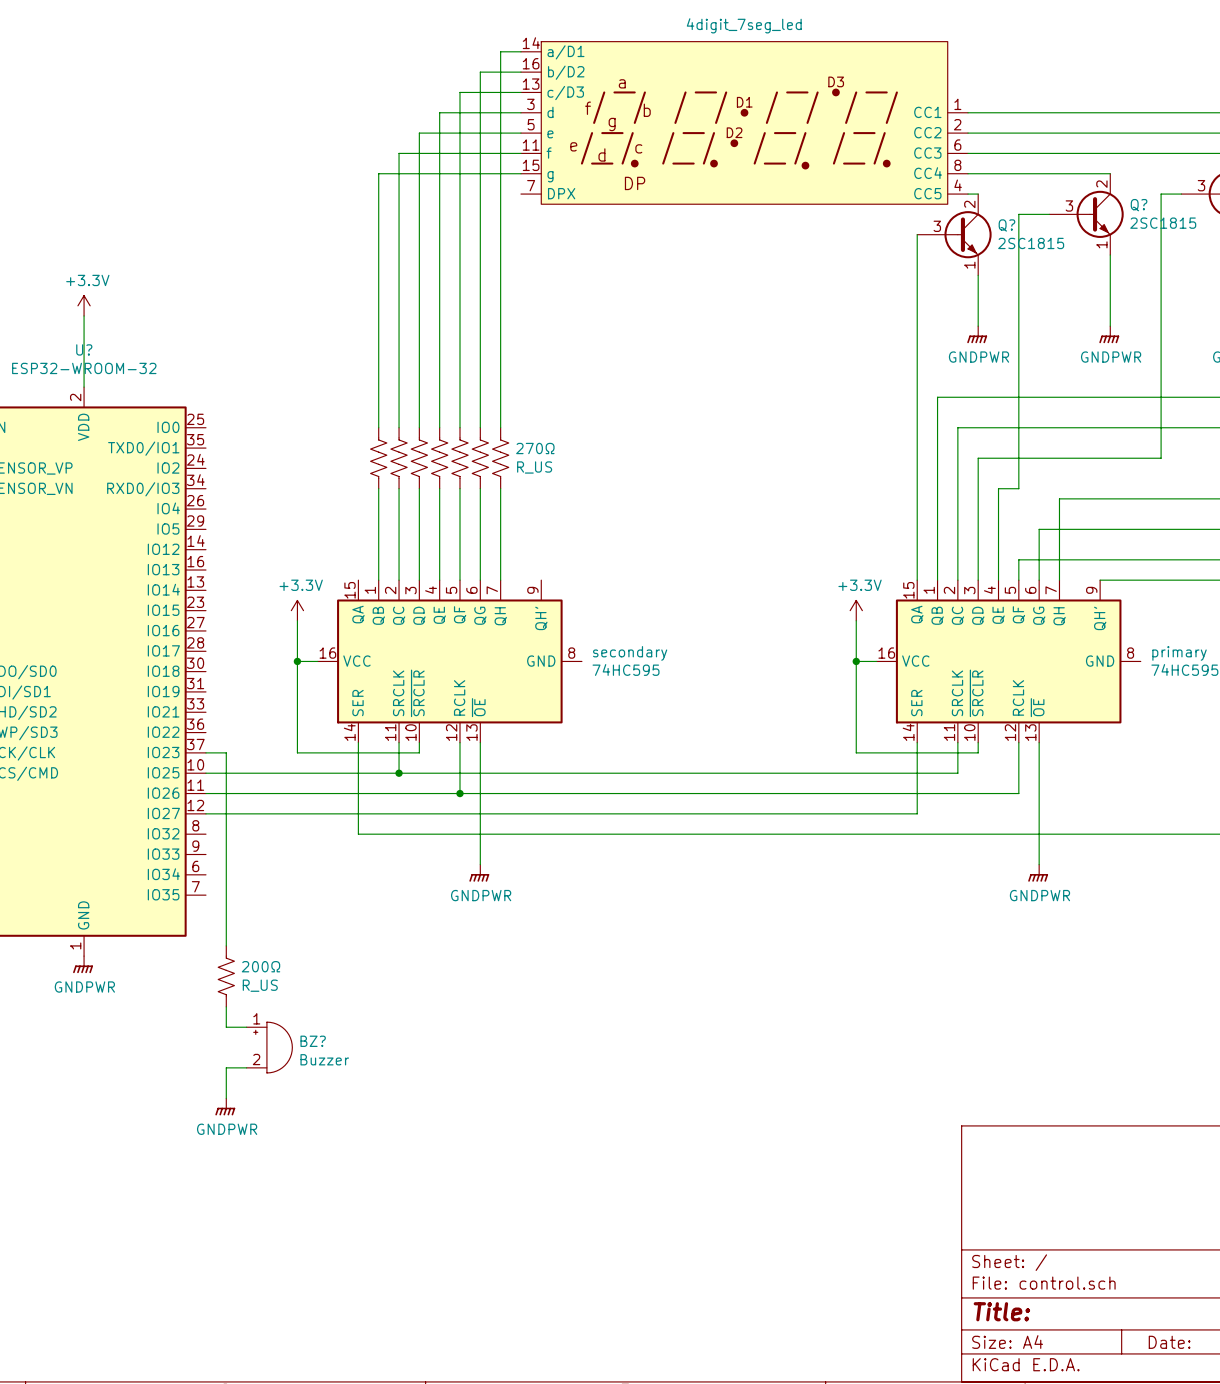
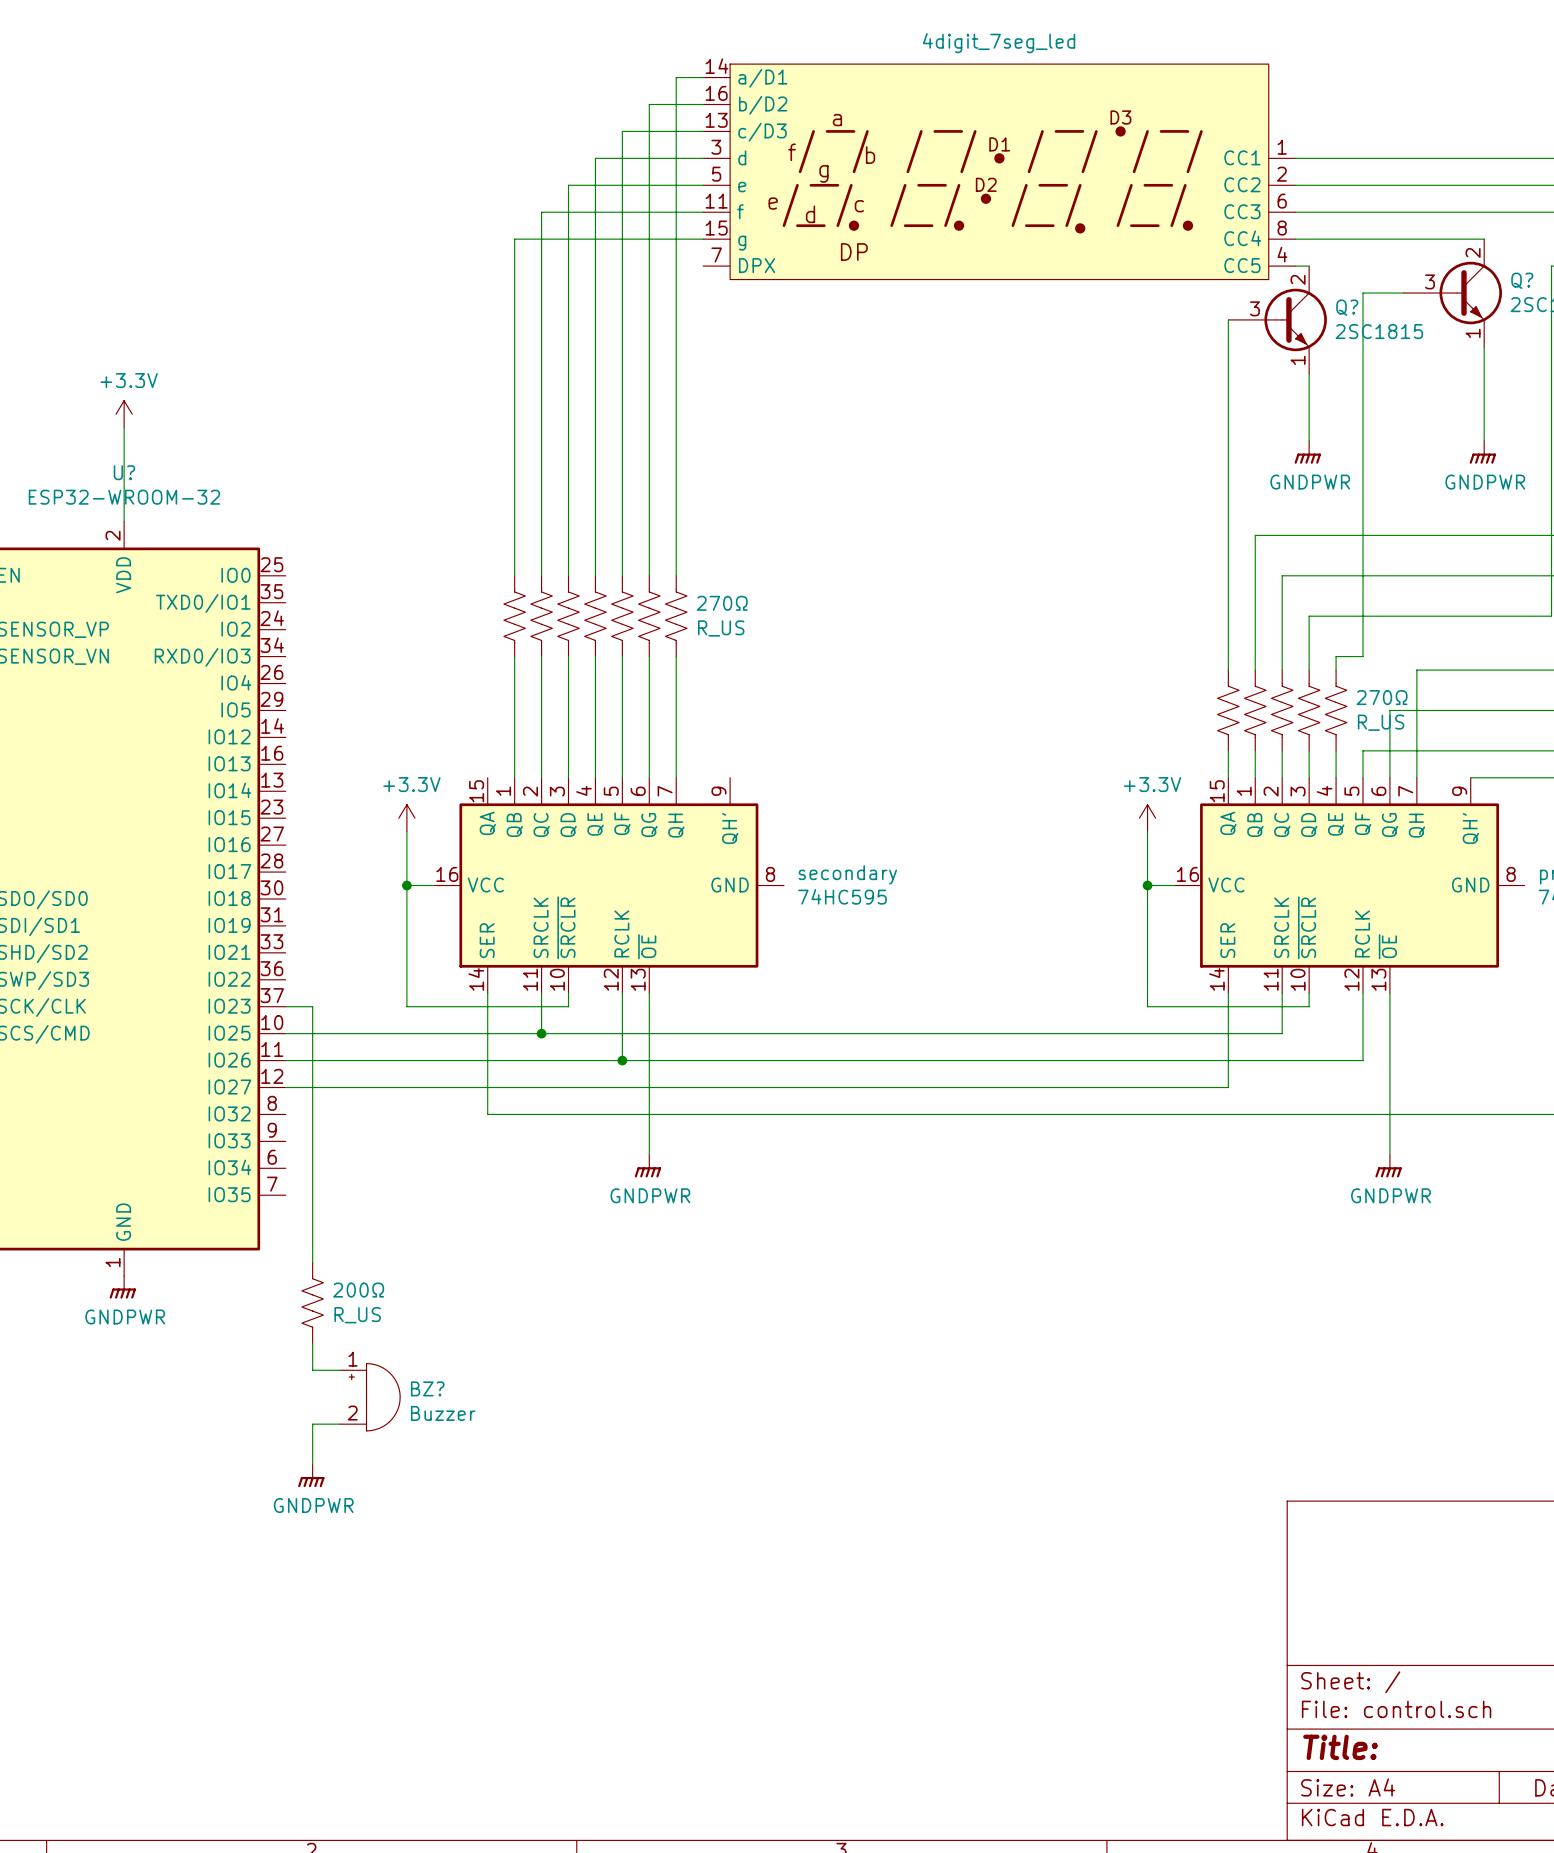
part: none -> (1228, 710)
part: none -> (1255, 710)
part: none -> (1282, 710)
part: none -> (1309, 710)
270Ω: none -> R_US (1336, 710)

